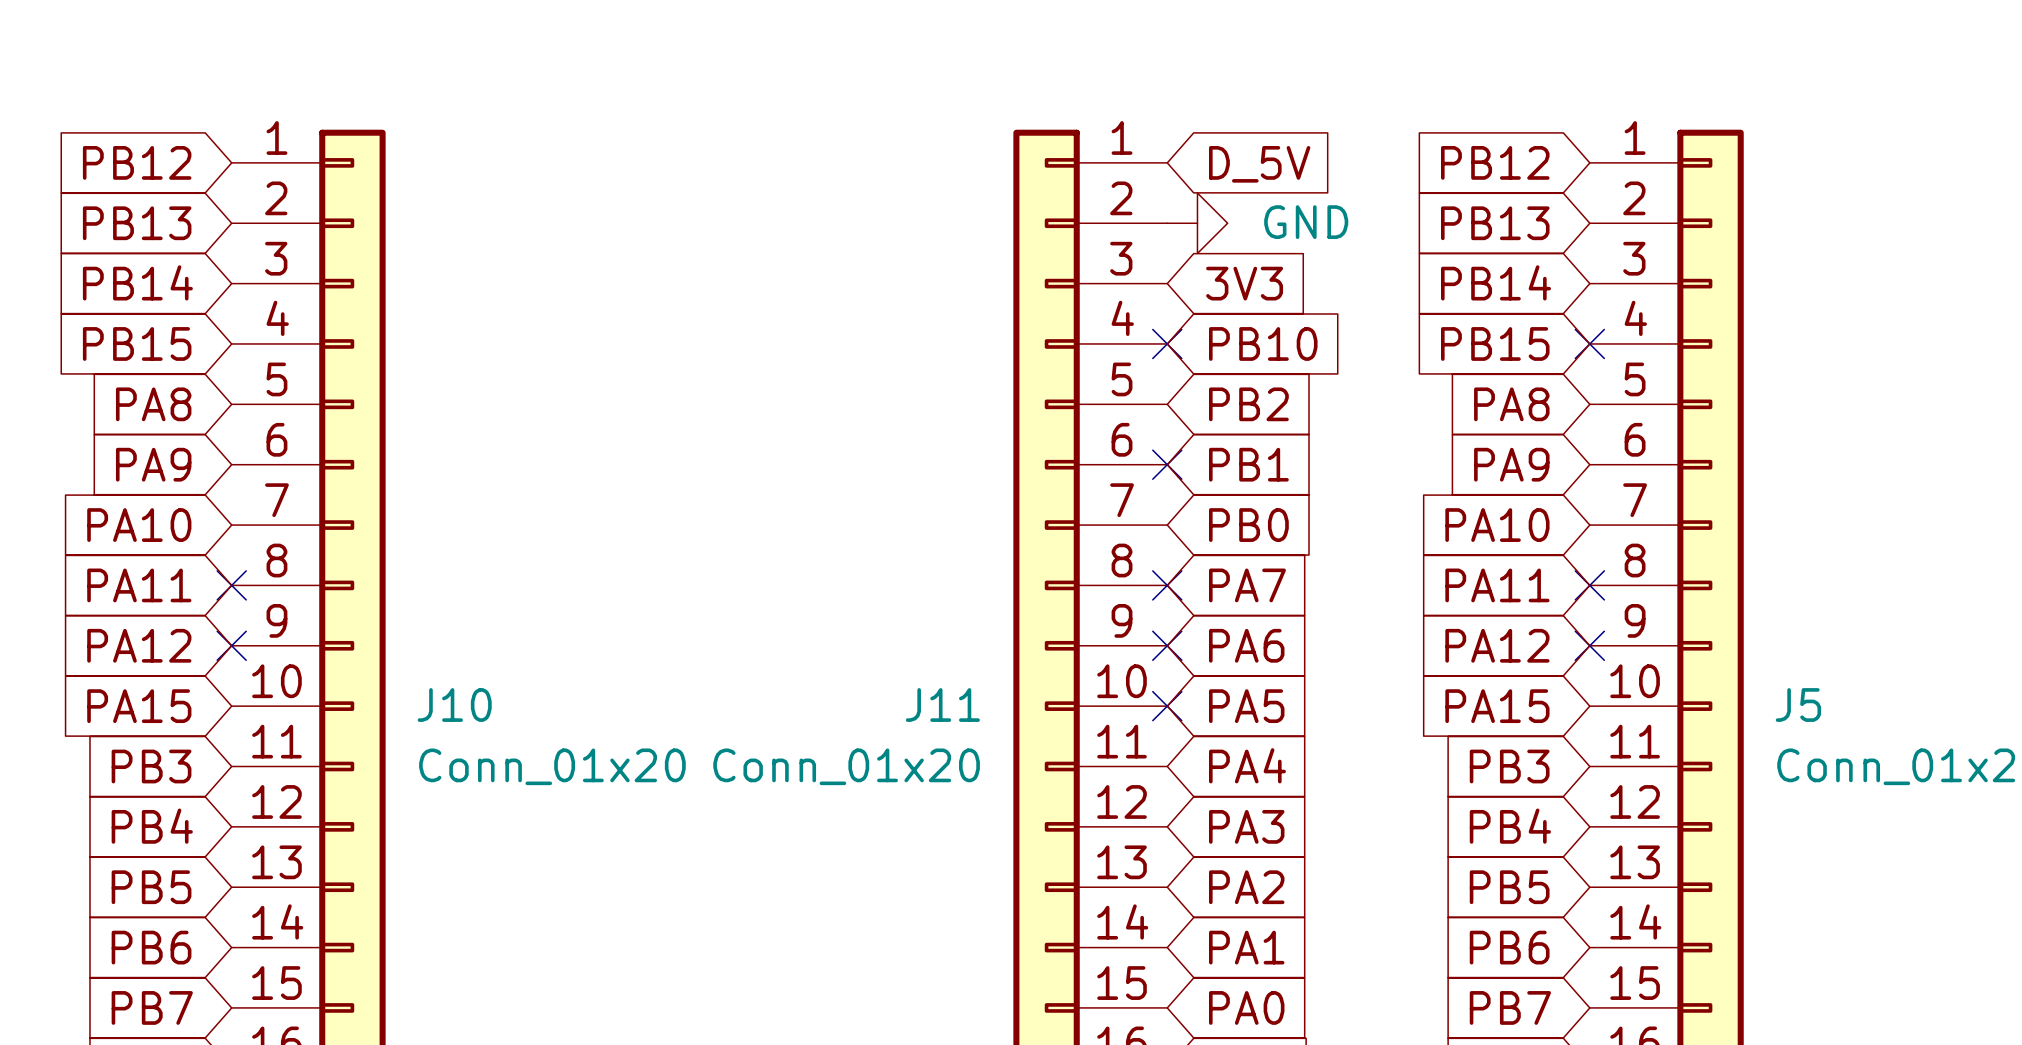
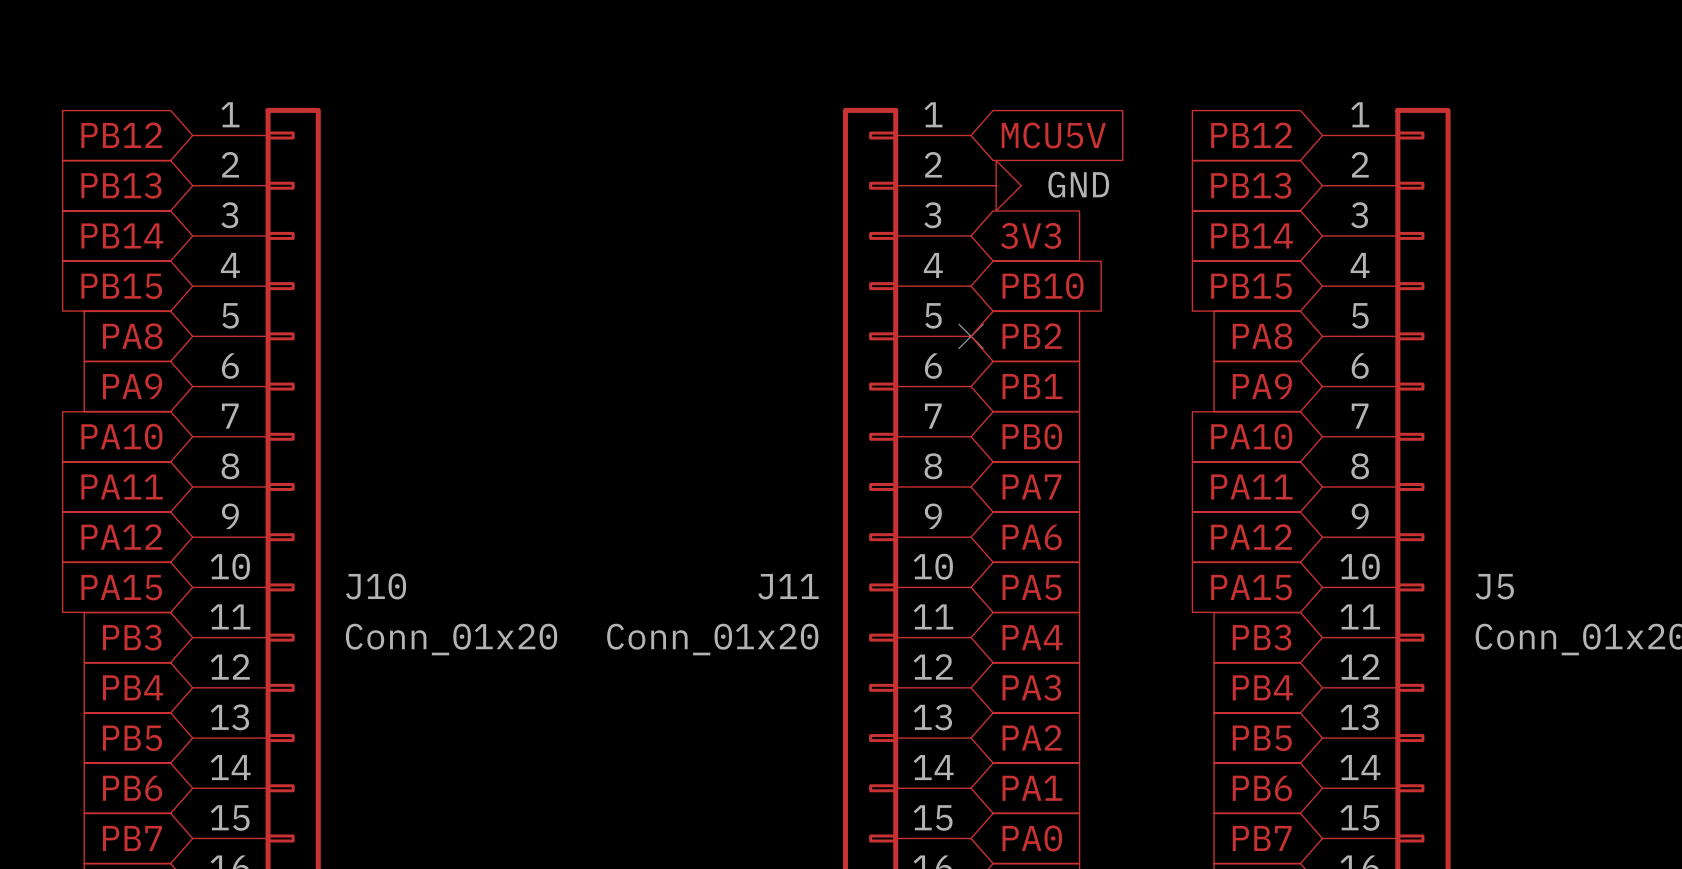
global label: D_5V (1259, 164) -> MCU5V (1053, 135)
no-connect mark: (1167, 343) -> none
no-connect mark: (1589, 343) -> none
no-connect mark: none -> (971, 336)
no-connect mark: (1167, 464) -> none
no-connect mark: (231, 585) -> none
no-connect mark: (1167, 585) -> none
no-connect mark: (1589, 585) -> none
no-connect mark: (231, 645) -> none
no-connect mark: (1167, 645) -> none
no-connect mark: (1589, 645) -> none
no-connect mark: (1167, 706) -> none

